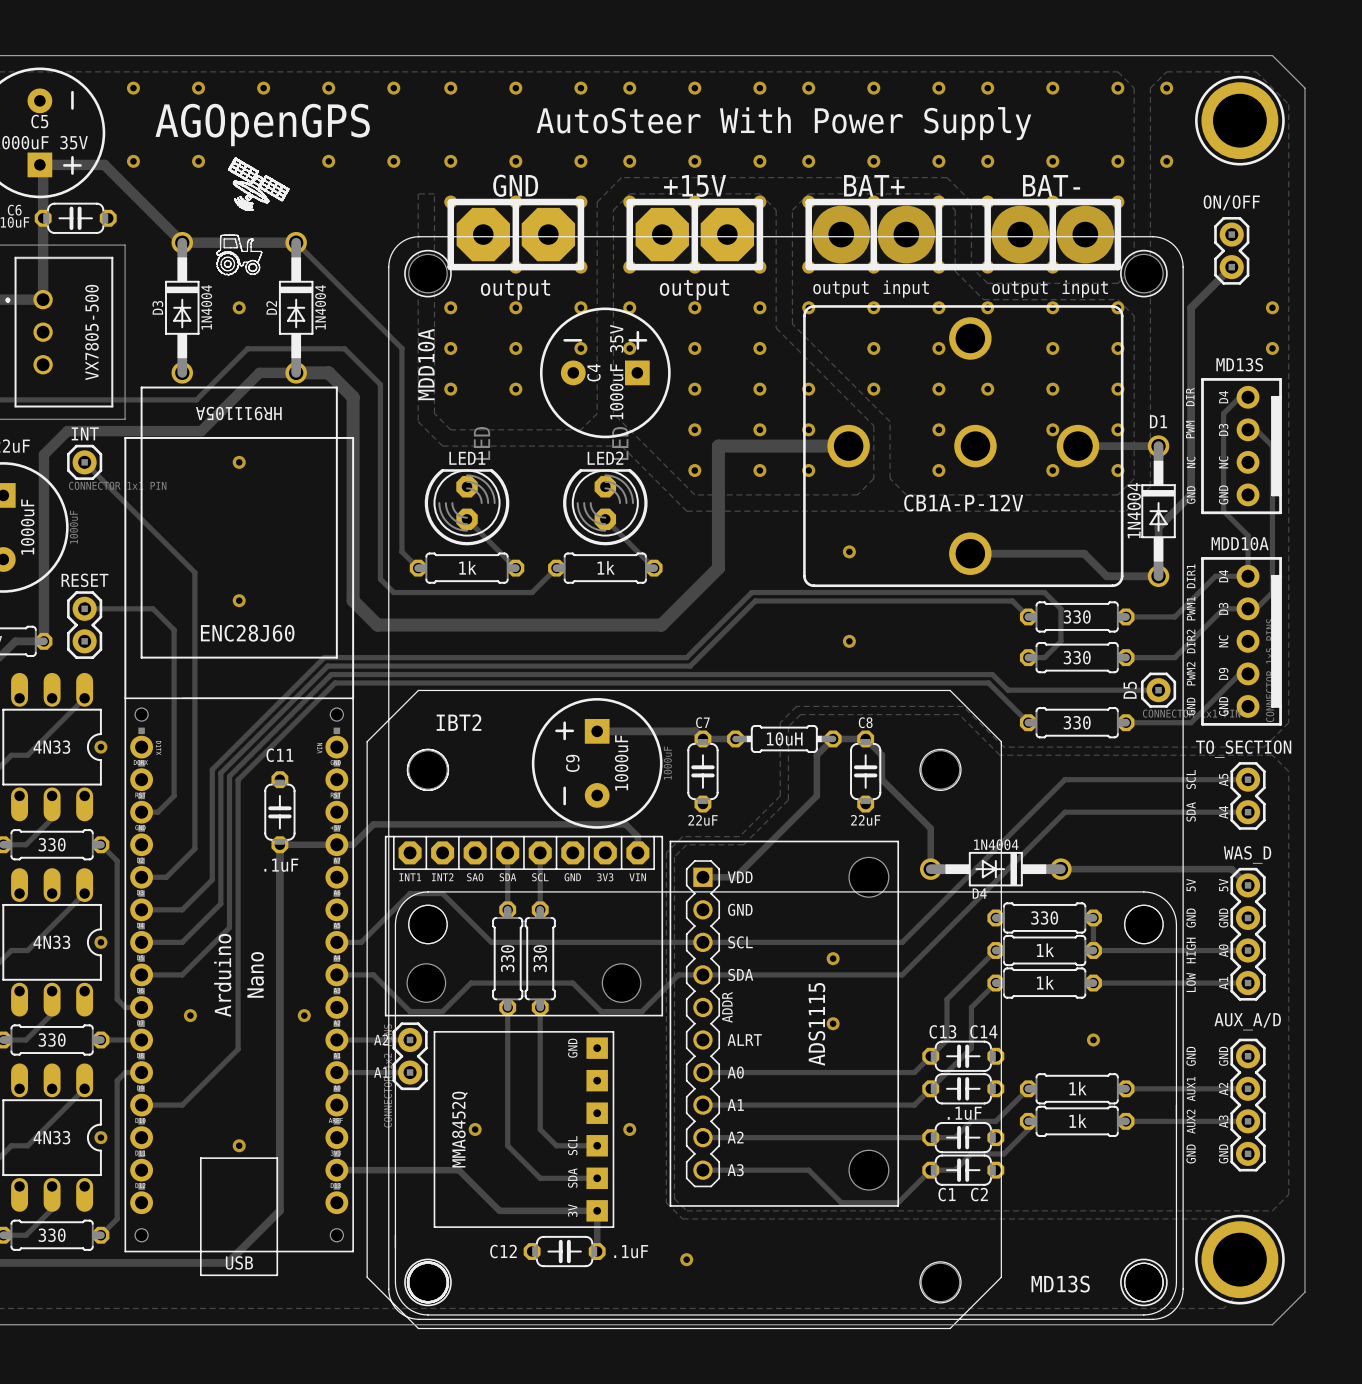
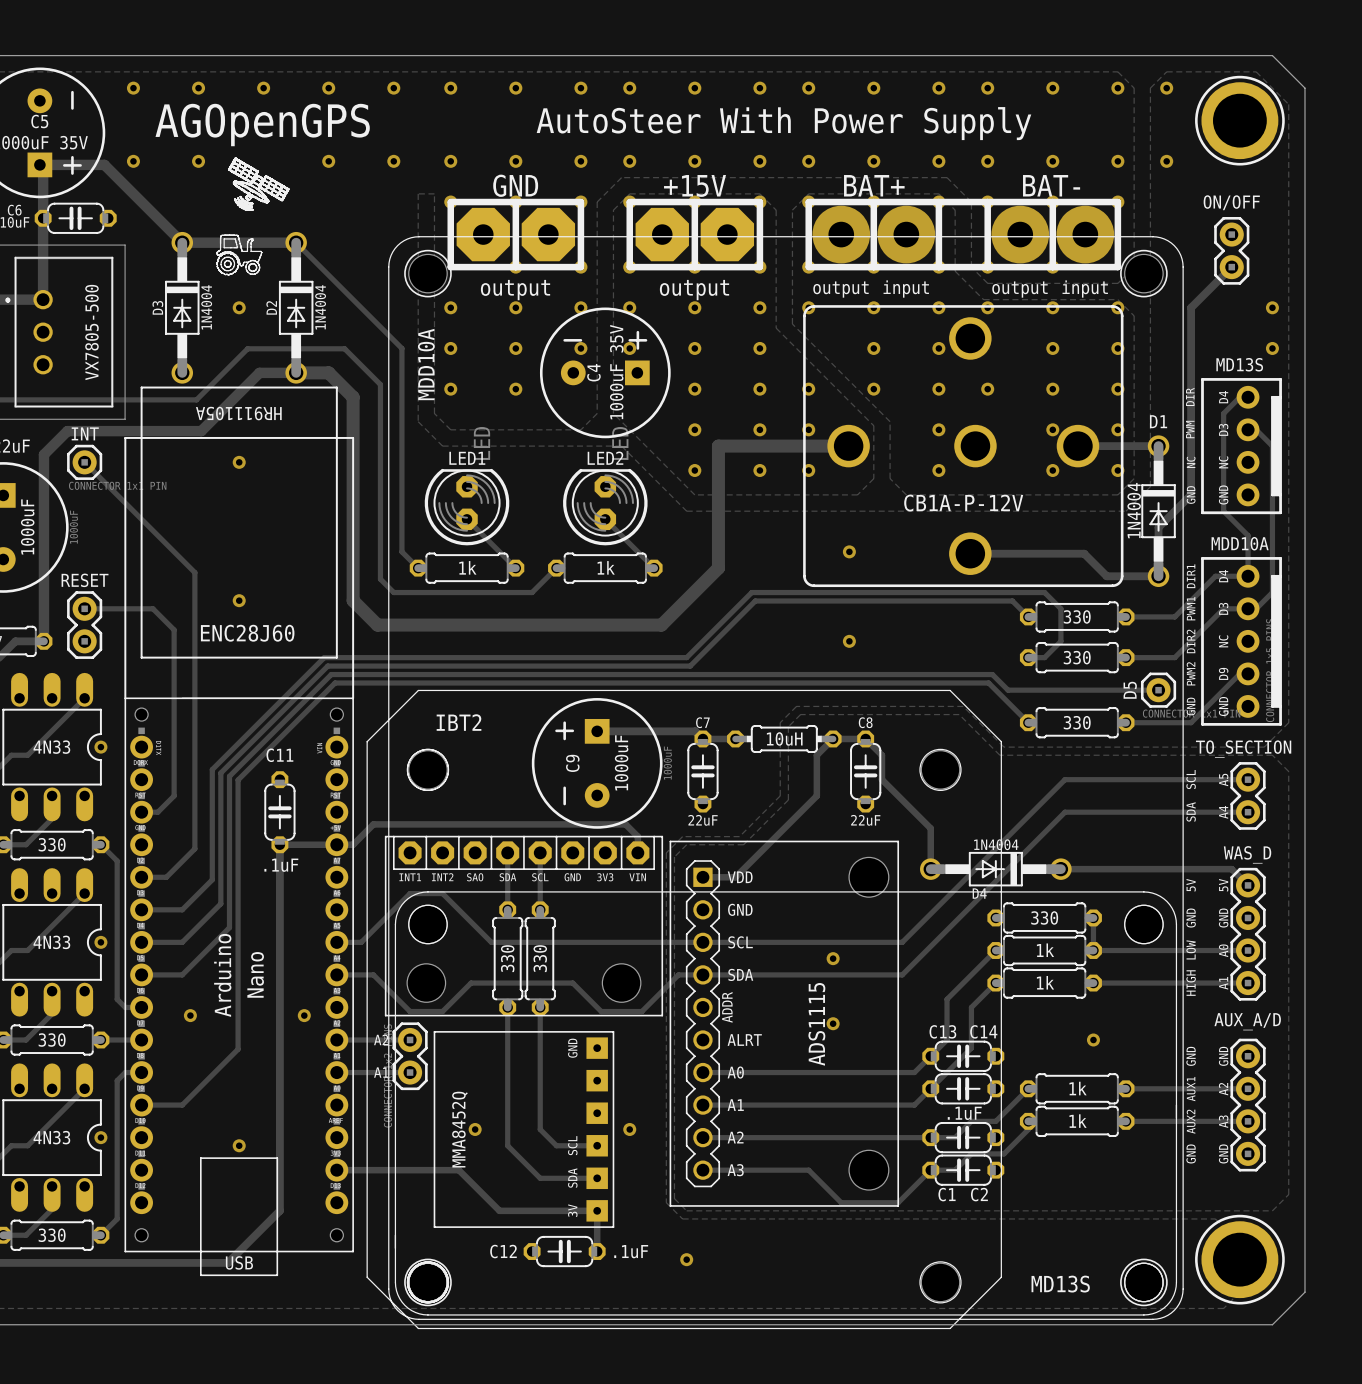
text: HIGH (1191, 950) -> LOW (1191, 949)
text: LOW (1191, 982) -> HIGH (1191, 983)

